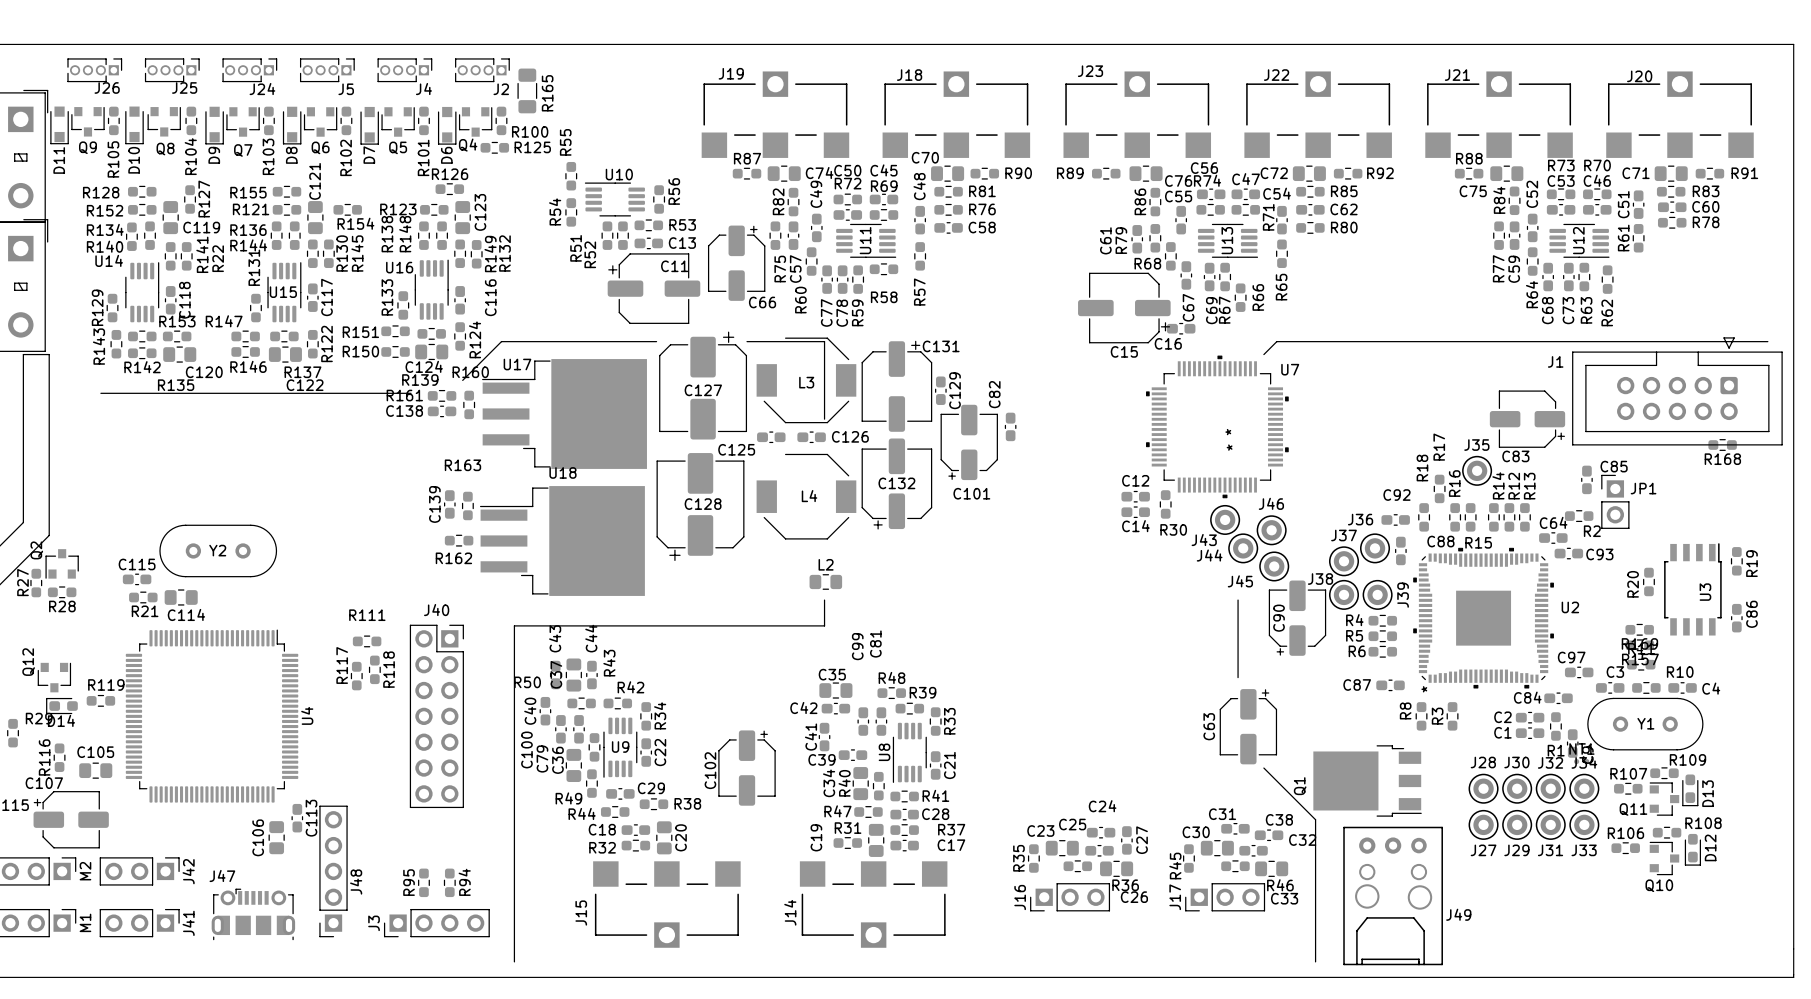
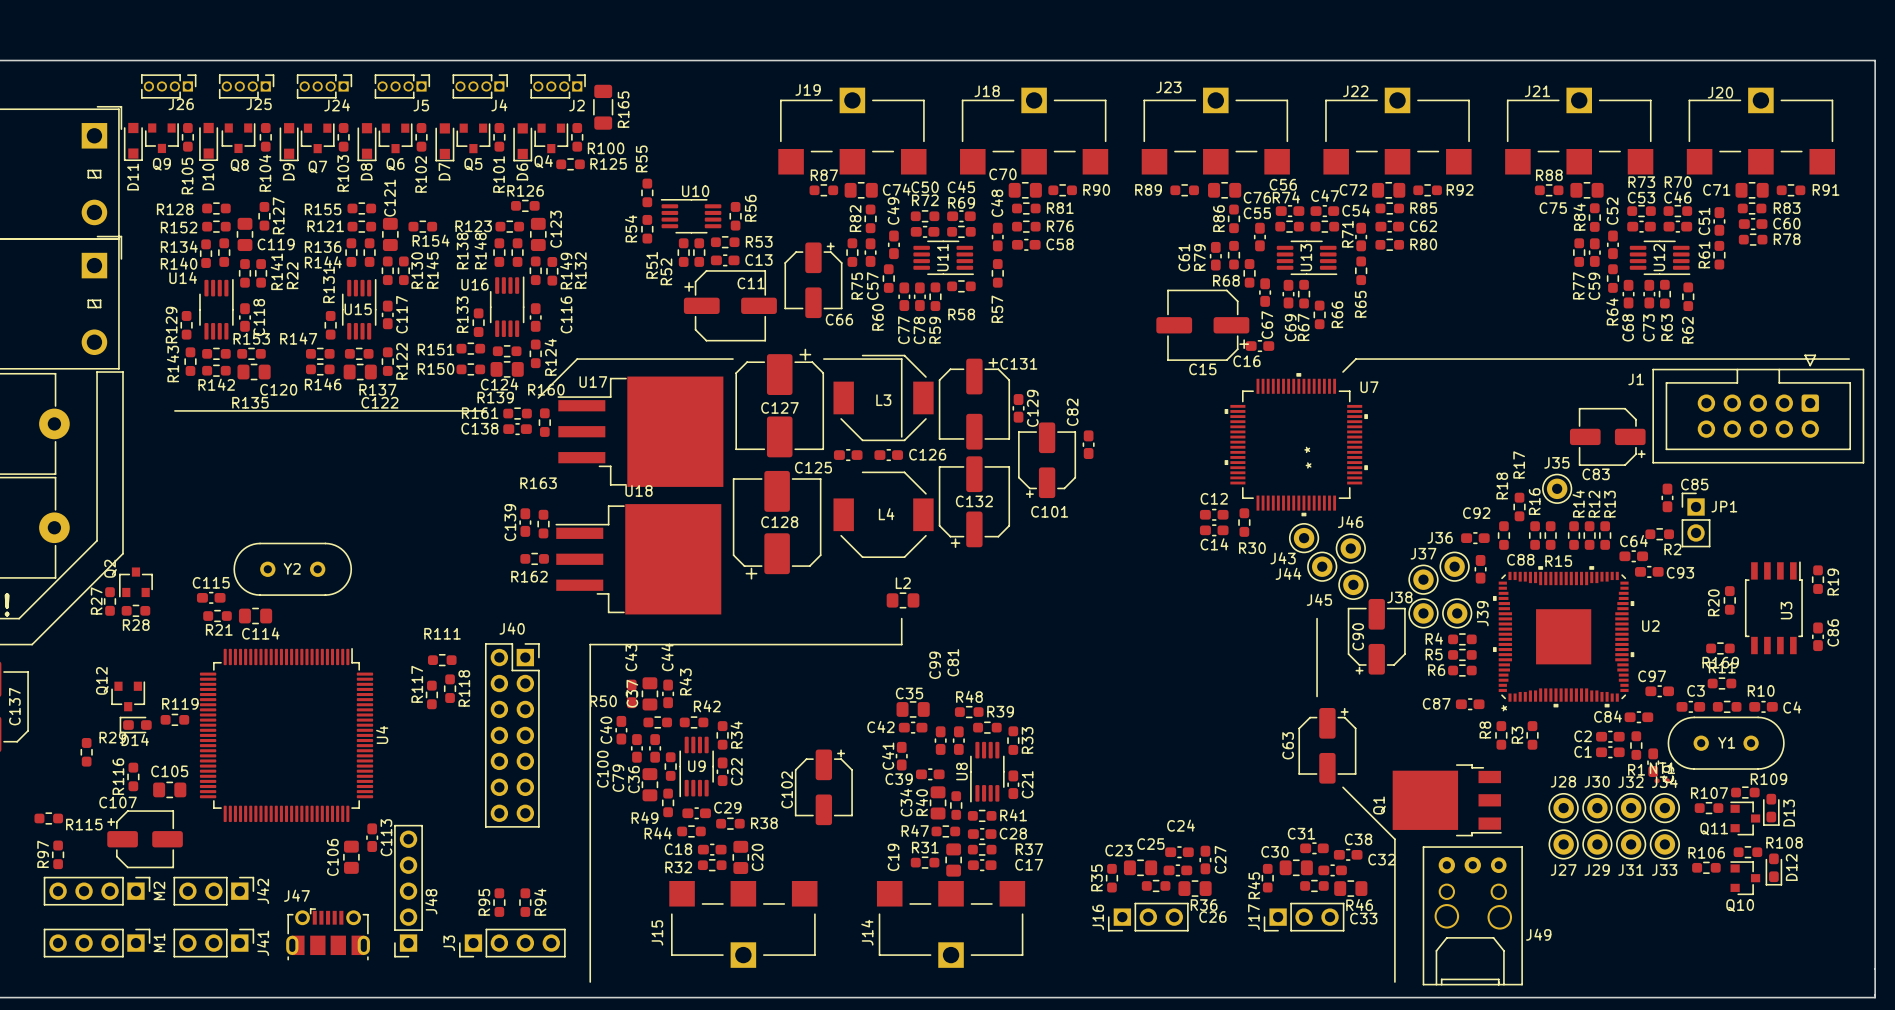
R168: (1722, 445) -> none
R157: (1639, 645) -> none

